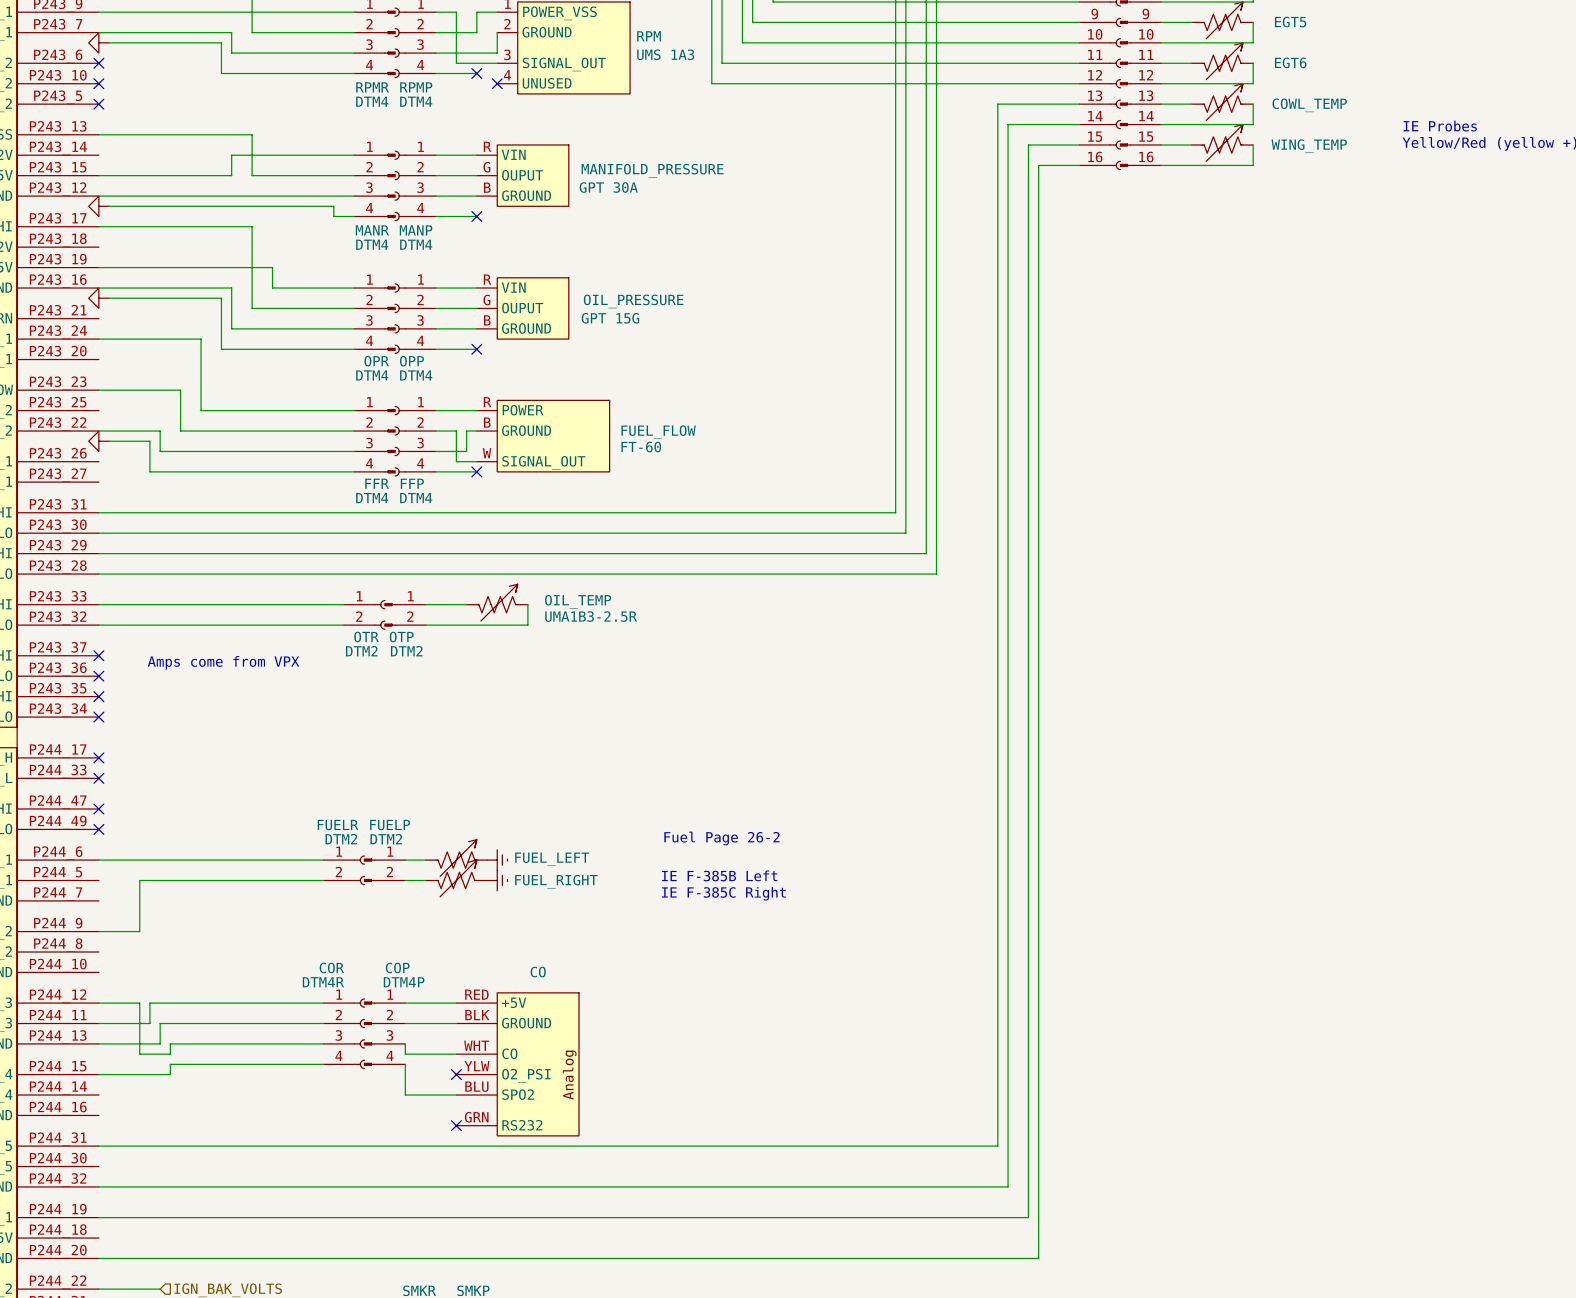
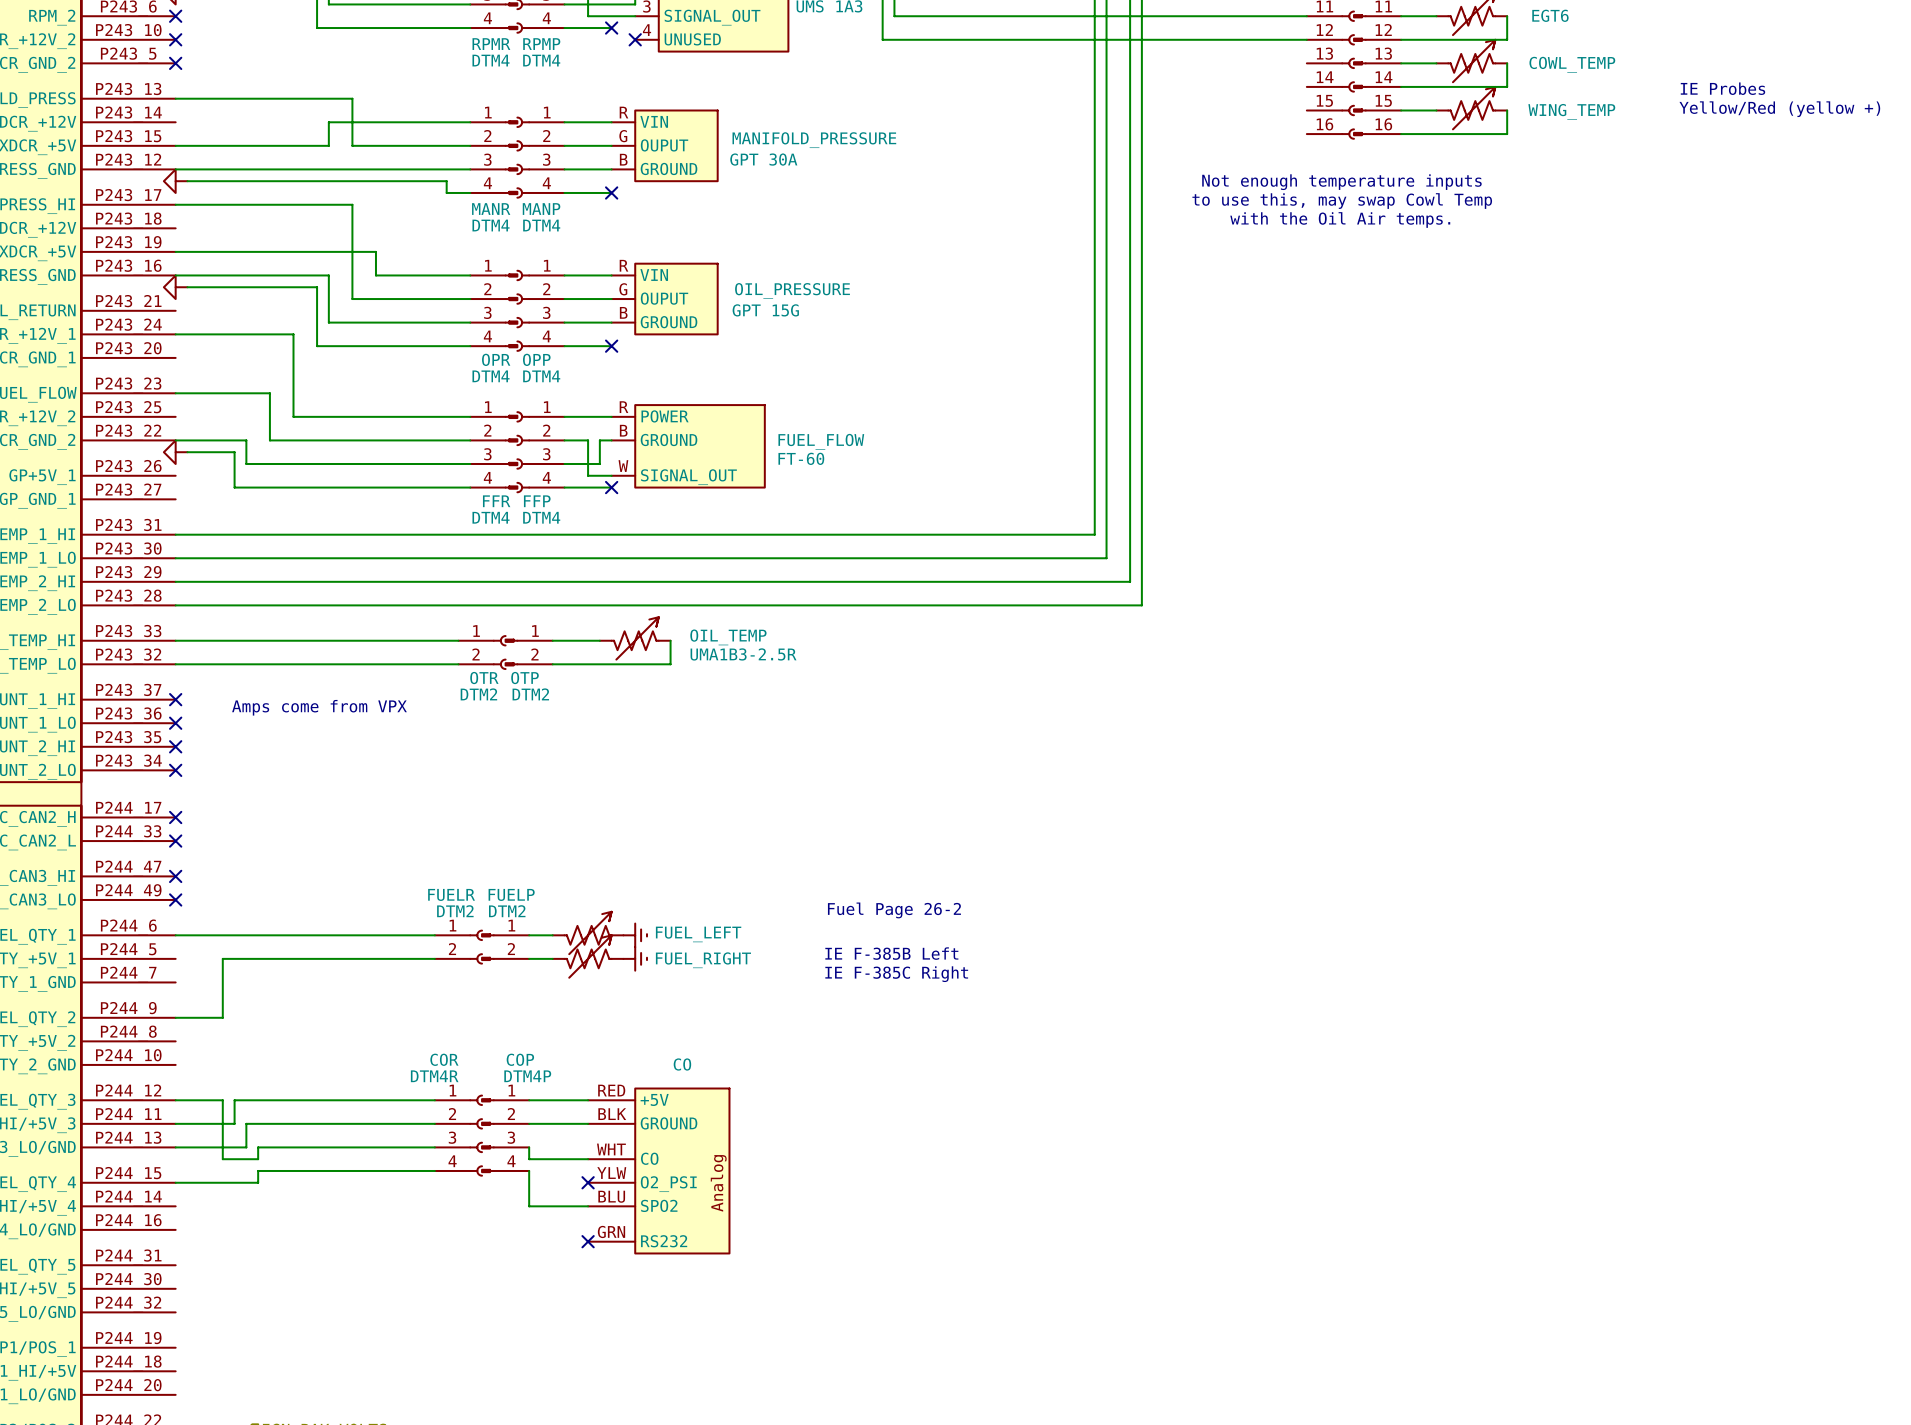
wire: (1079, 104) (997, 104) (997, 1146) (98, 1146) -> none
wire: (1079, 124) (1008, 124) (1008, 1186) (98, 1186) -> none
wire: (1079, 145) (1028, 145) (1028, 1217) (98, 1217) -> none
wire: (1079, 165) (1038, 165) (1038, 1258) (98, 1258) -> none
text: none -> Not enough temperature inputs (1341, 182)
text: none -> to use this, may swap Cowl Temp (1342, 201)
text: none -> with the Oil Air temps. (1340, 220)

